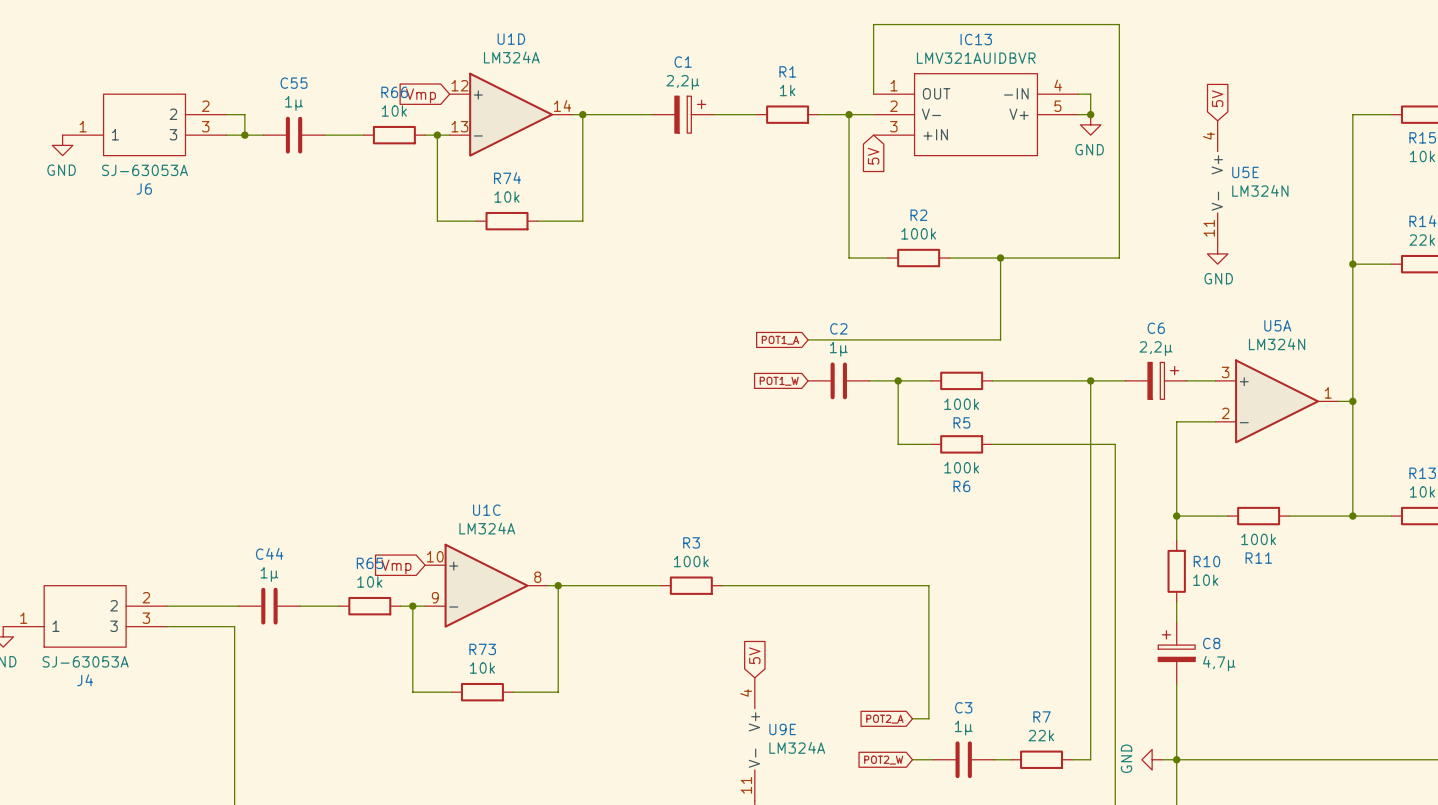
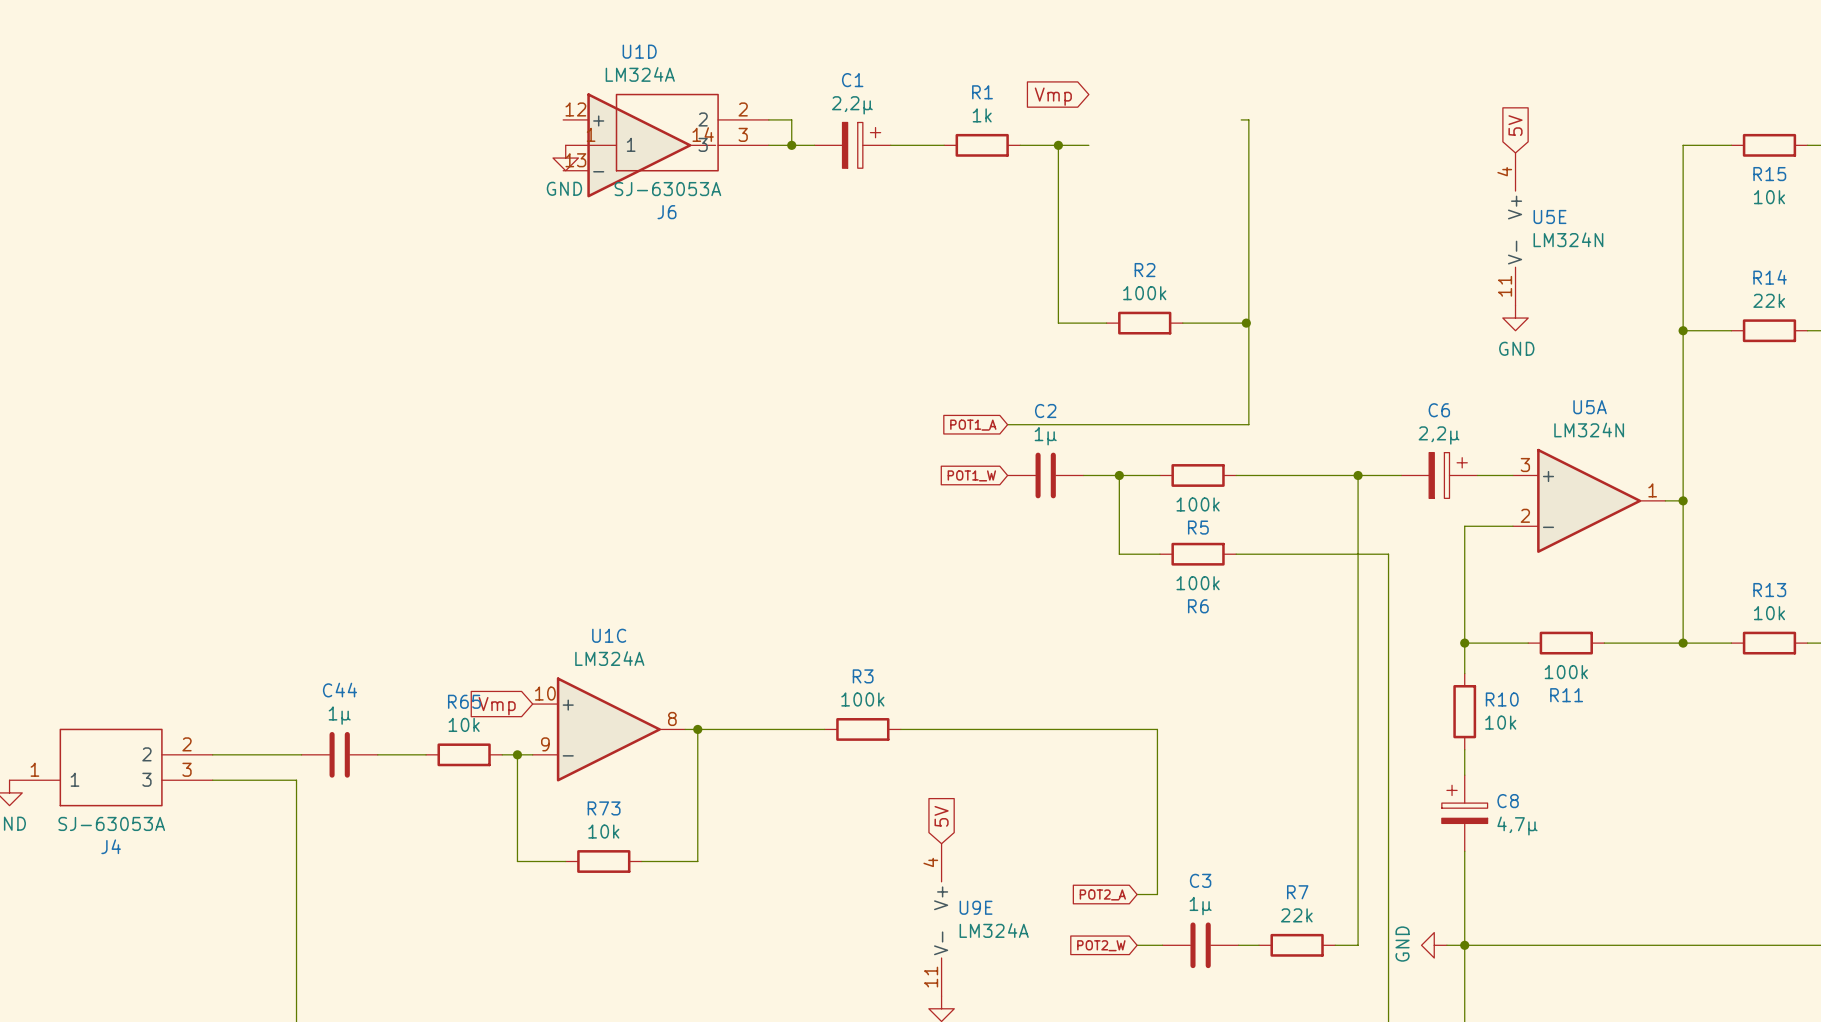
global label: none -> Vmp (1053, 96)
wire: none -> (768, 119) (791, 119) (791, 145)
wire: (873, 94) (873, 24) (1119, 24) (1119, 258) (1002, 258) -> none
wire: (1078, 94) (1090, 94) (1090, 114) (1078, 114) -> none
global label: Vmp (421, 95) -> none
wire: (226, 114) (244, 114) (244, 135) -> none
wire: (582, 114) (582, 221) (537, 221) -> none
junction: (582, 114) -> none
junction: none -> (791, 145)
IC13: LMV321AUIDBVR (976, 114) -> none
junction: (1090, 114) -> none
J6 position: (144, 124) -> (667, 132)
power symbol: none -> GND (565, 158)
power symbol: GND (1090, 124) -> none
wire: (226, 135) (263, 135) -> none
junction: (244, 135) -> none
C55: 1µ (294, 135) -> none
wire: (324, 135) (363, 135) -> none
R66: 10k (394, 135) -> none
wire: (425, 135) (449, 135) -> none
wire: (437, 135) (437, 221) (476, 221) -> none
junction: (437, 135) -> none
power symbol: GND (62, 145) -> none
global label: 5V (873, 156) -> none
R74: 10k (507, 221) -> none
wire: (1000, 258) (1000, 339) -> (1241, 119) (1248, 119) (1248, 424) (1246, 424)

